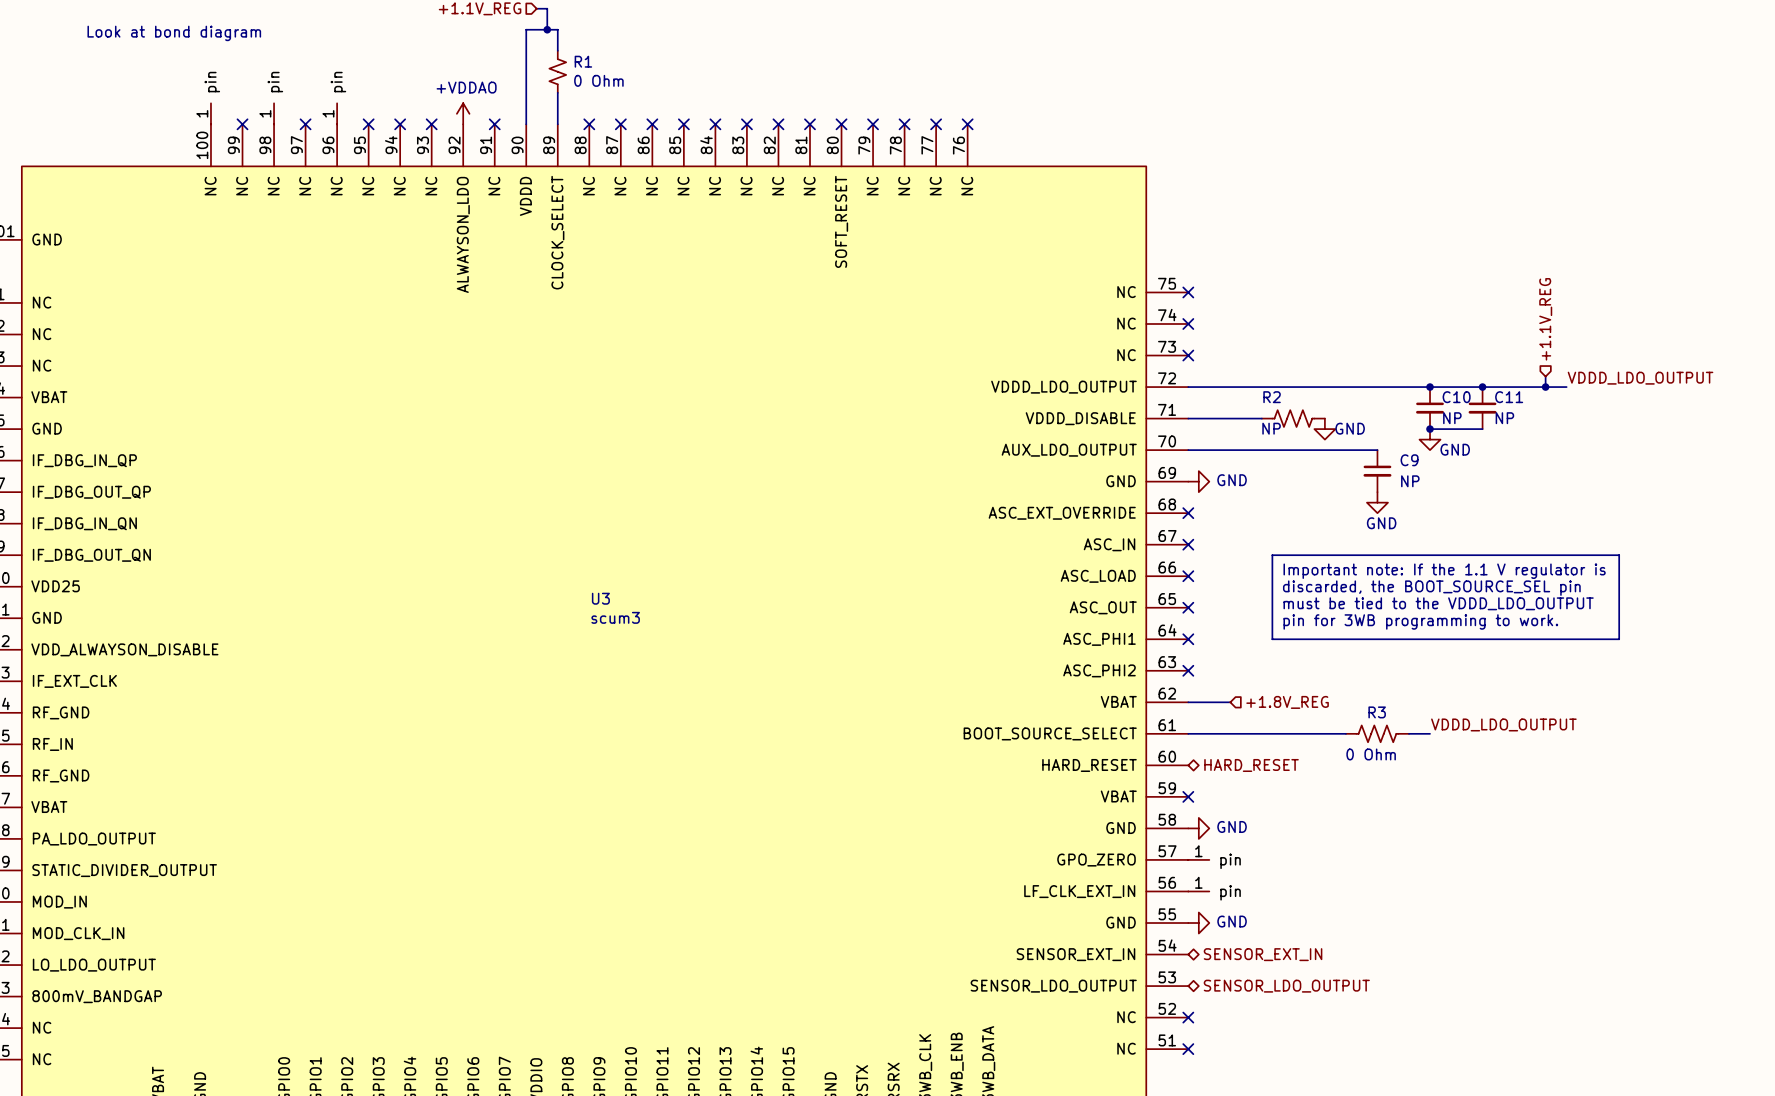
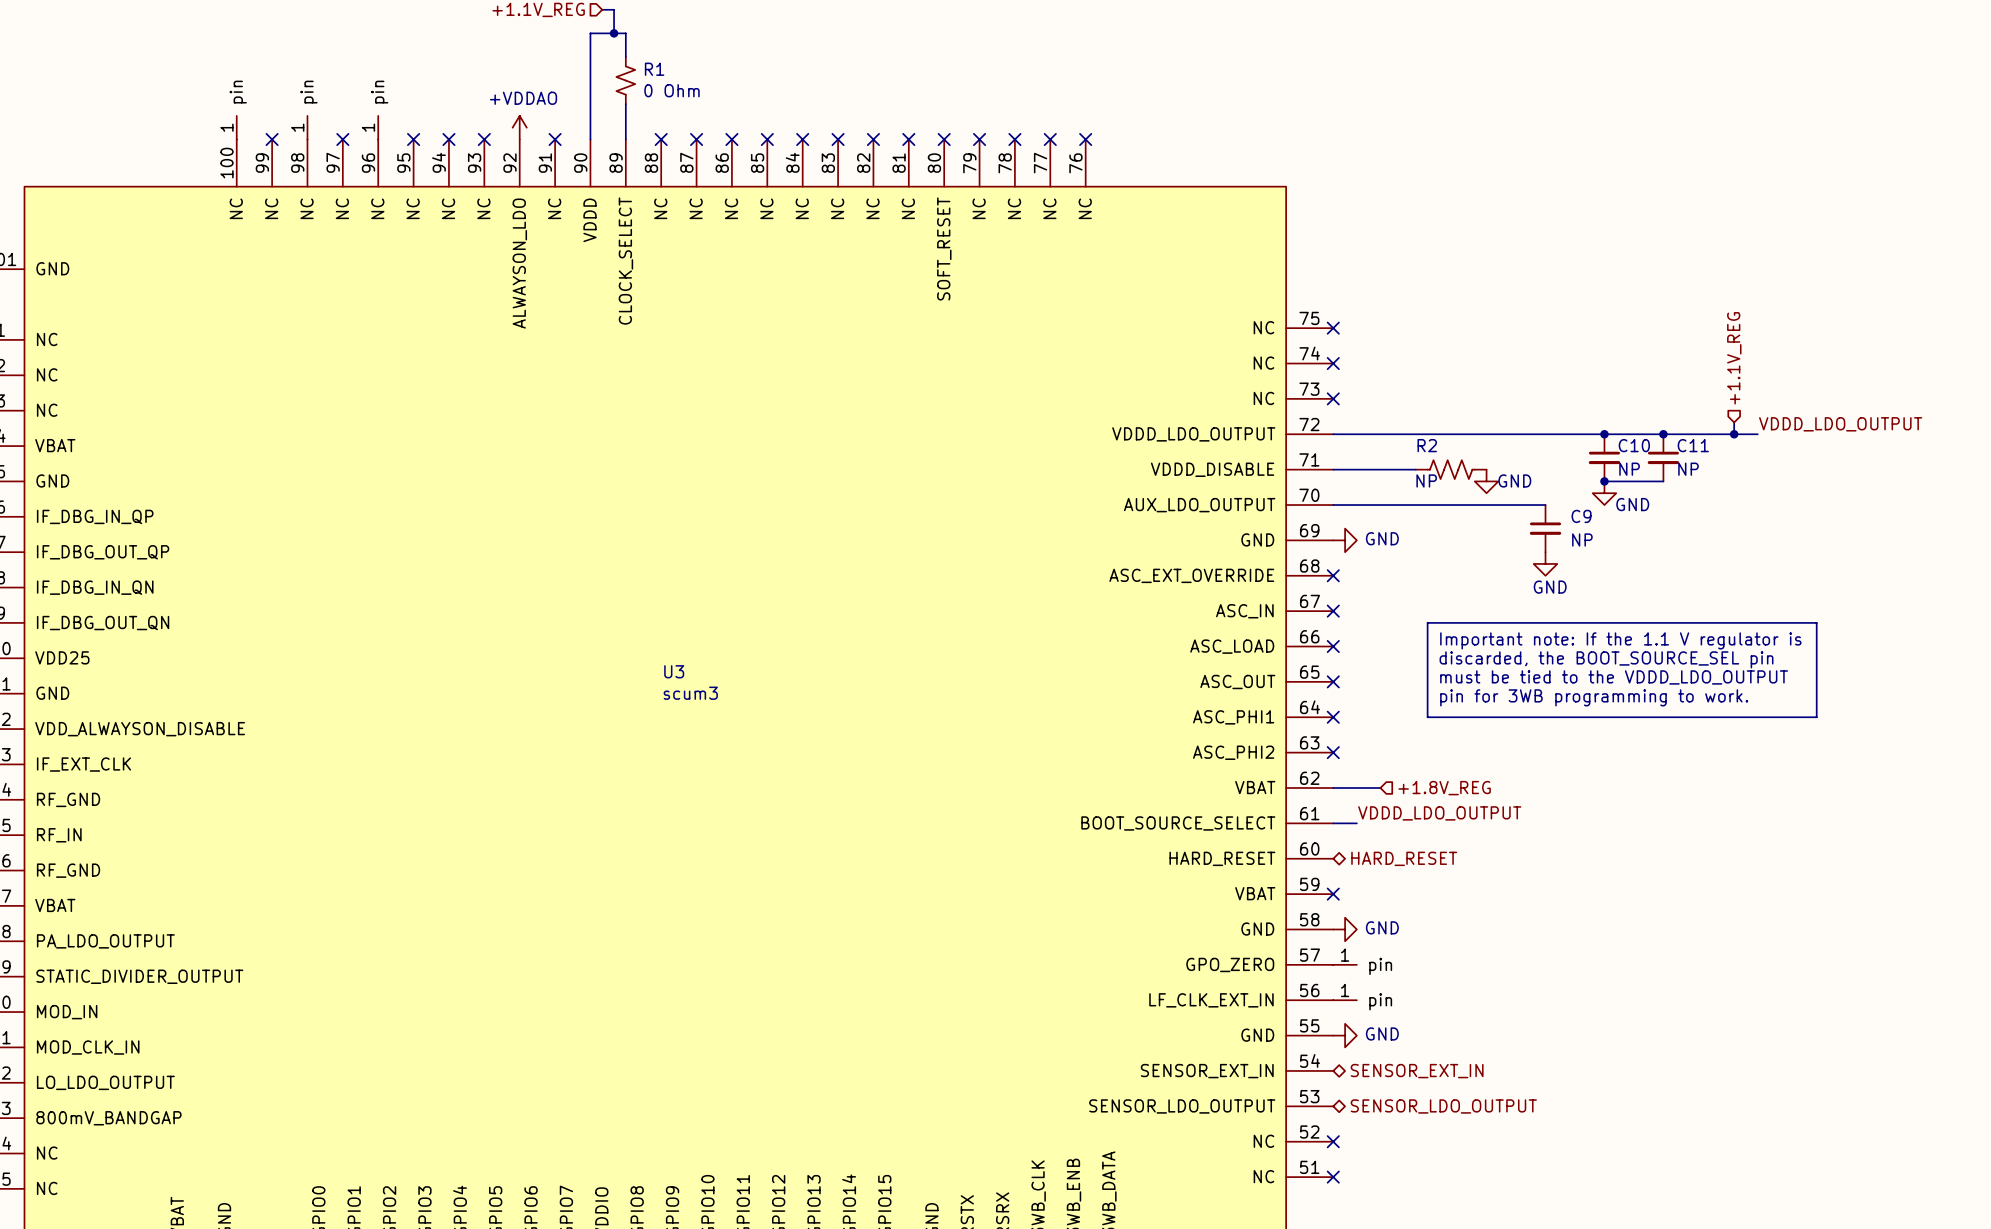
text: Look at bond diagram (174, 33) -> none
label: none -> VDDD_LDO_OUTPUT (1439, 813)
label: VDDD_LDO_OUTPUT (1503, 724) -> none
wire: (1209, 733) (1345, 733) -> none
R3: 0 Ohm (1377, 733) -> none
wire: (1408, 733) (1430, 733) -> none

